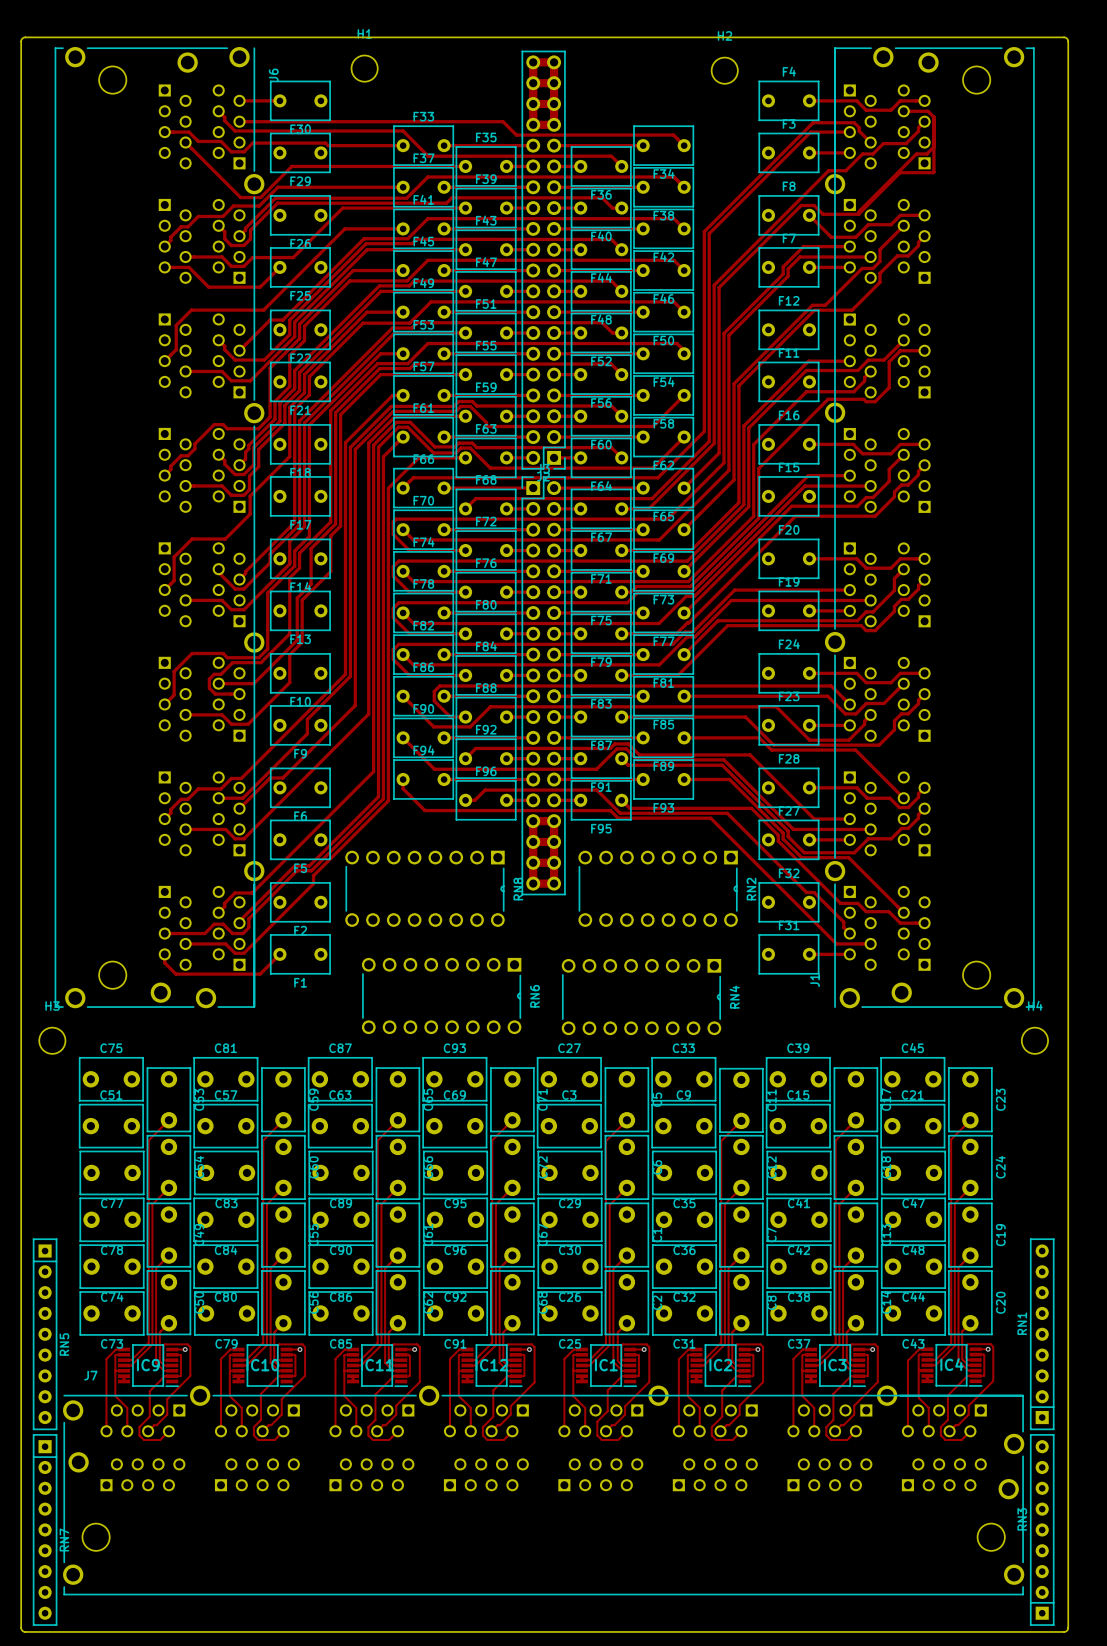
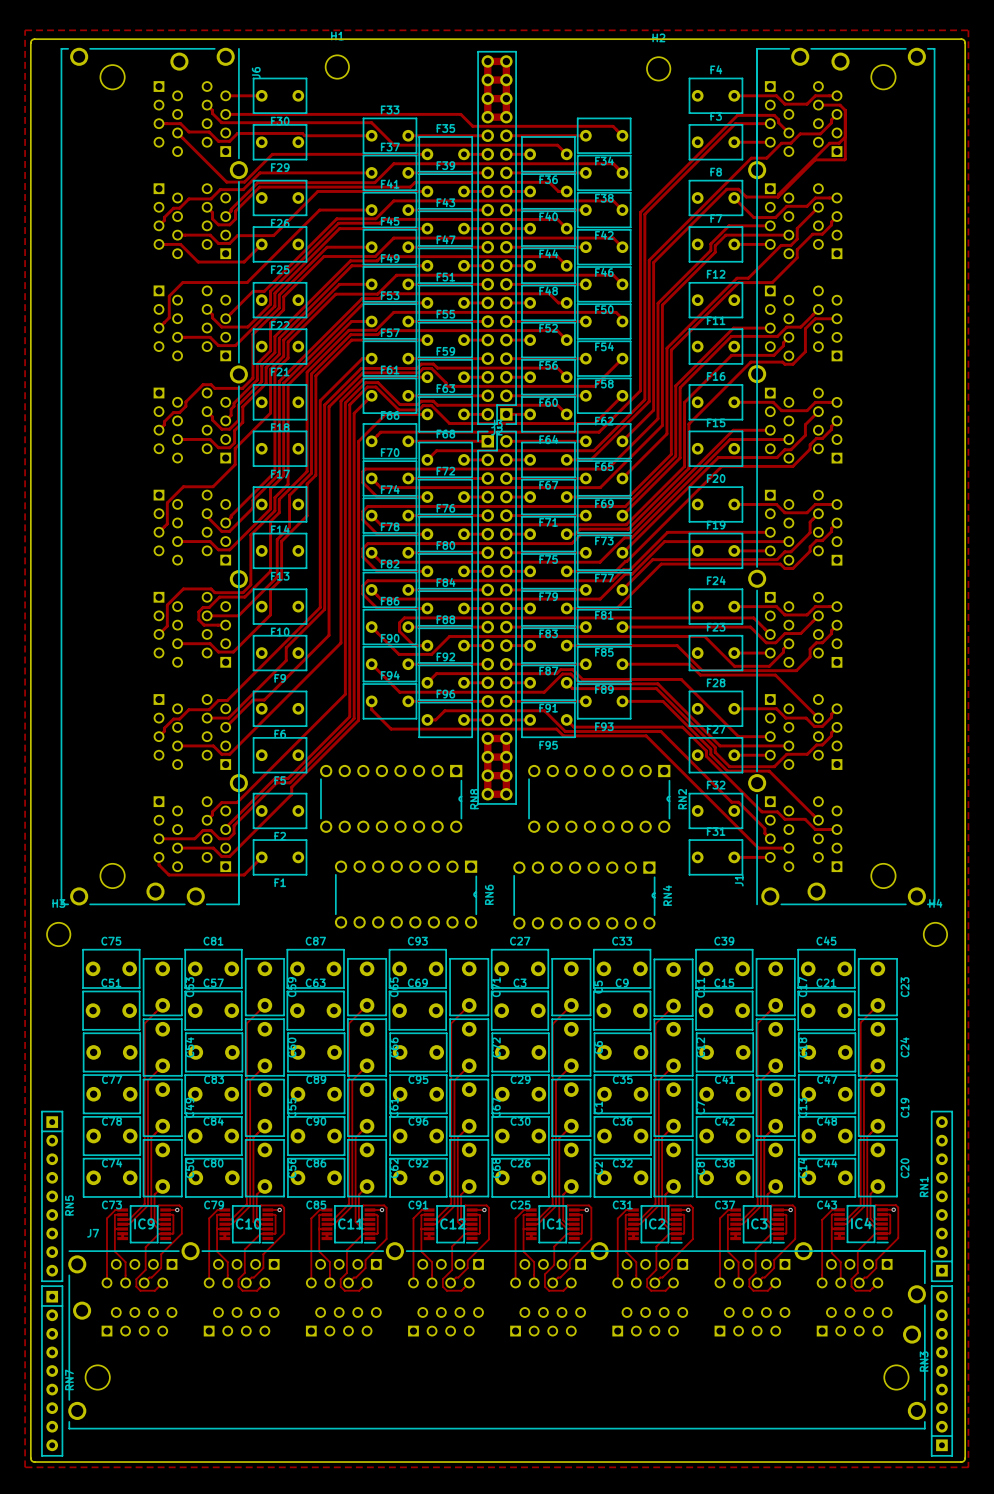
zone outline: none -> (25, 30) (25, 1467) (968, 1467) (968, 30) (25, 30)

